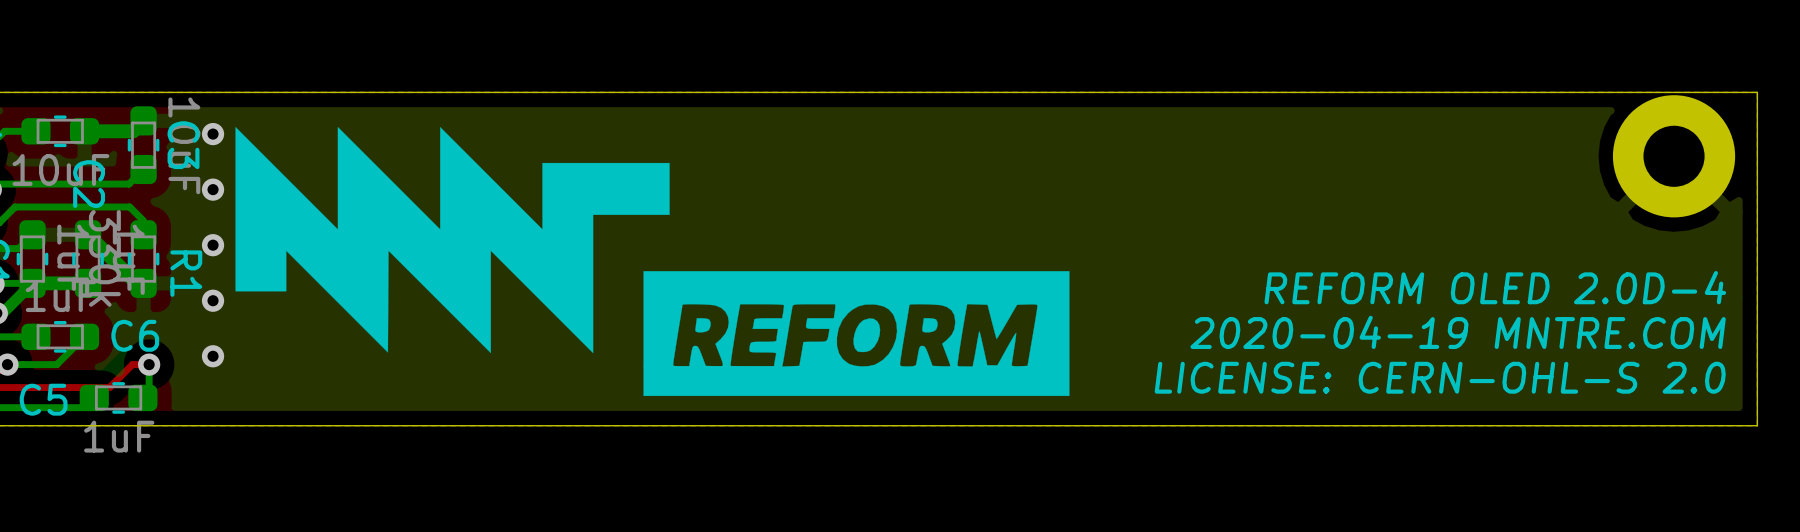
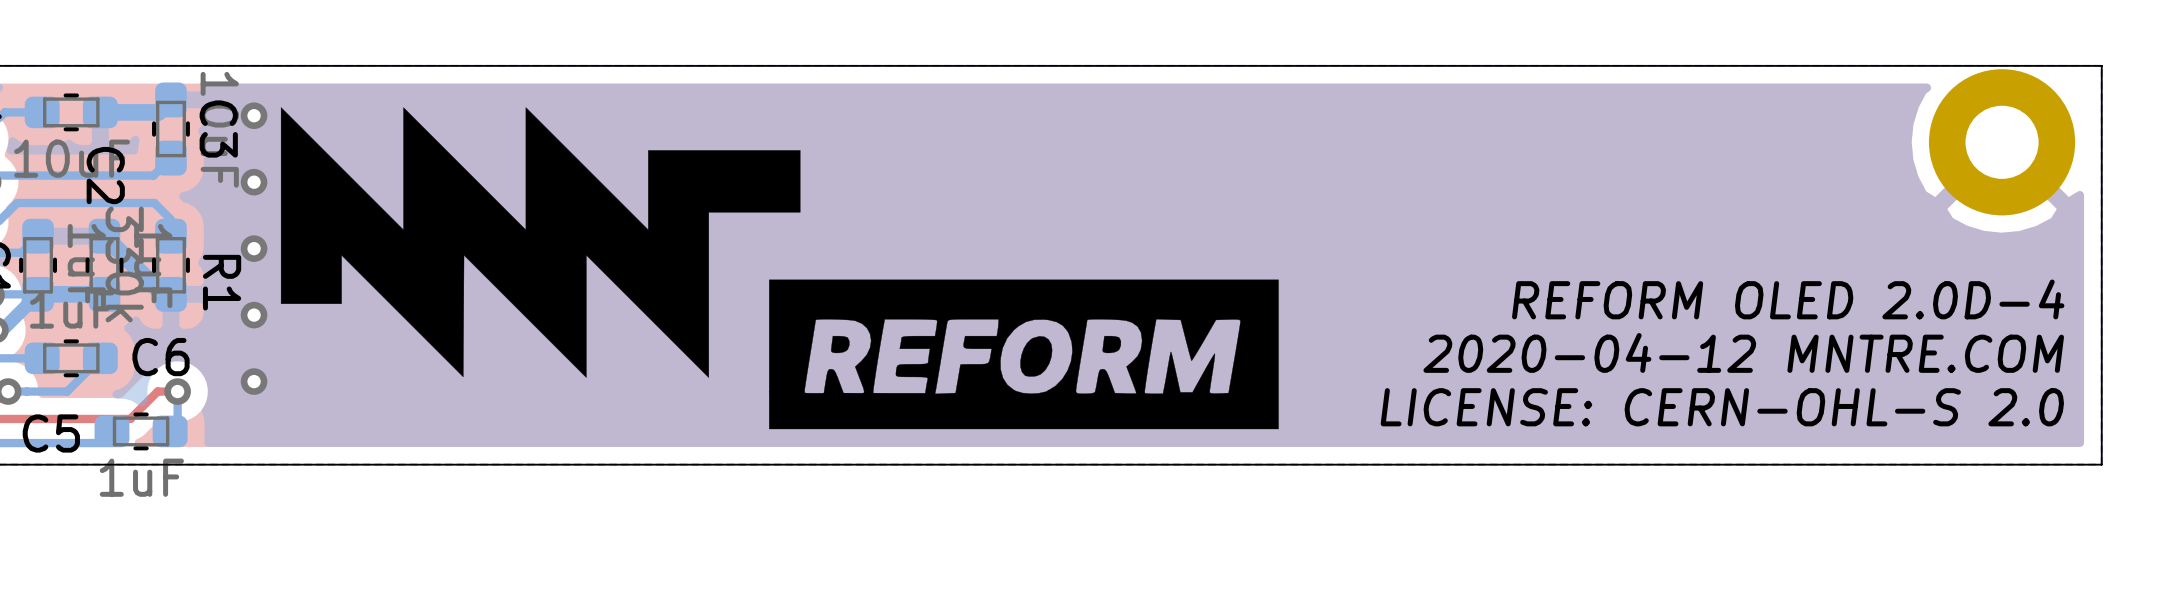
text: 2020-04-19 MNTRE.COM (1458, 332) -> 2020-04-12 MNTRE.COM (1743, 352)

